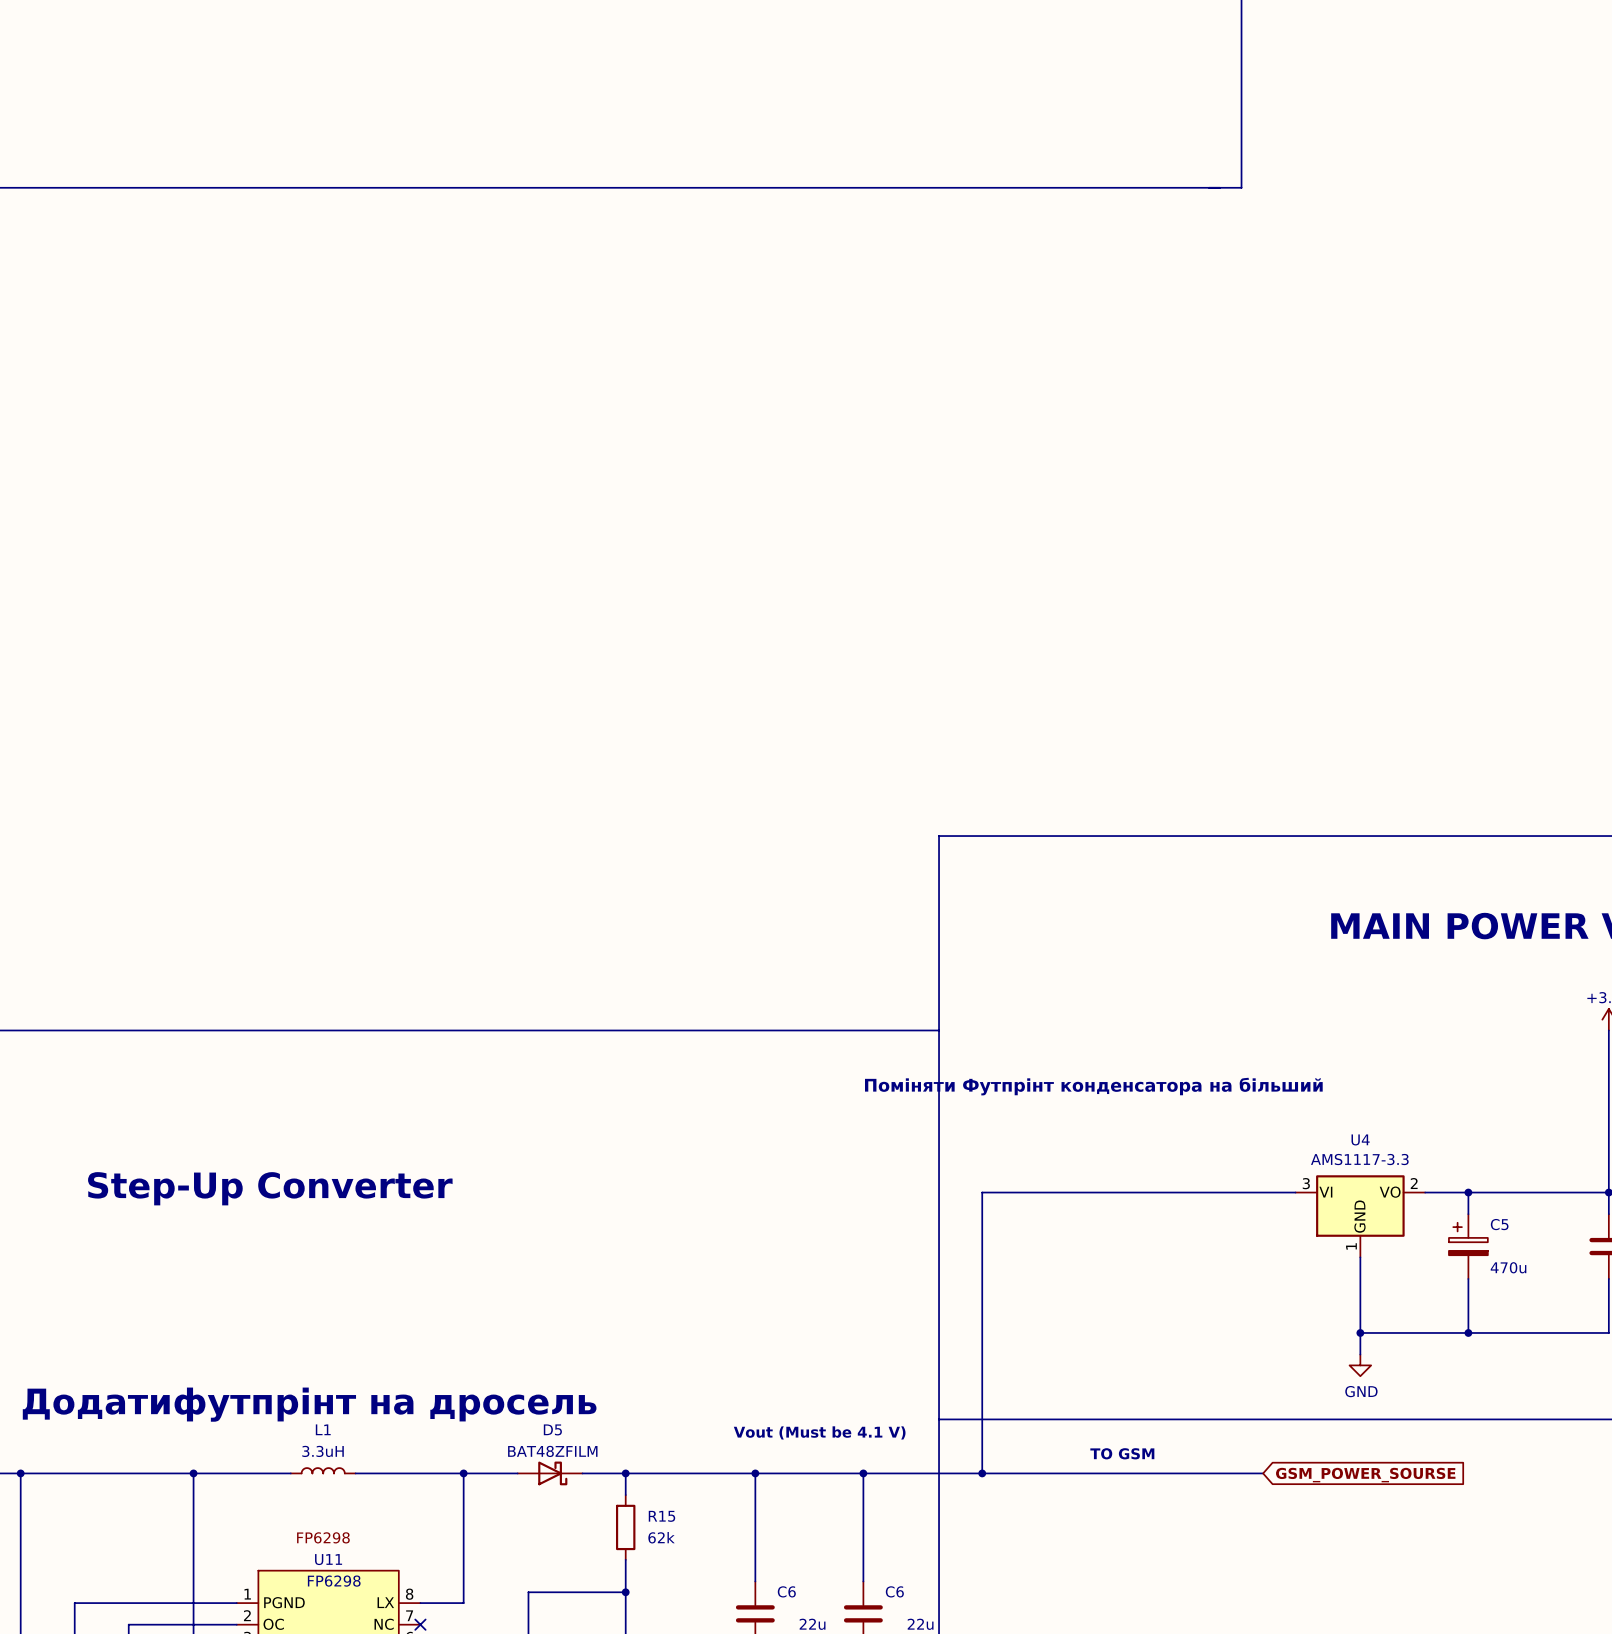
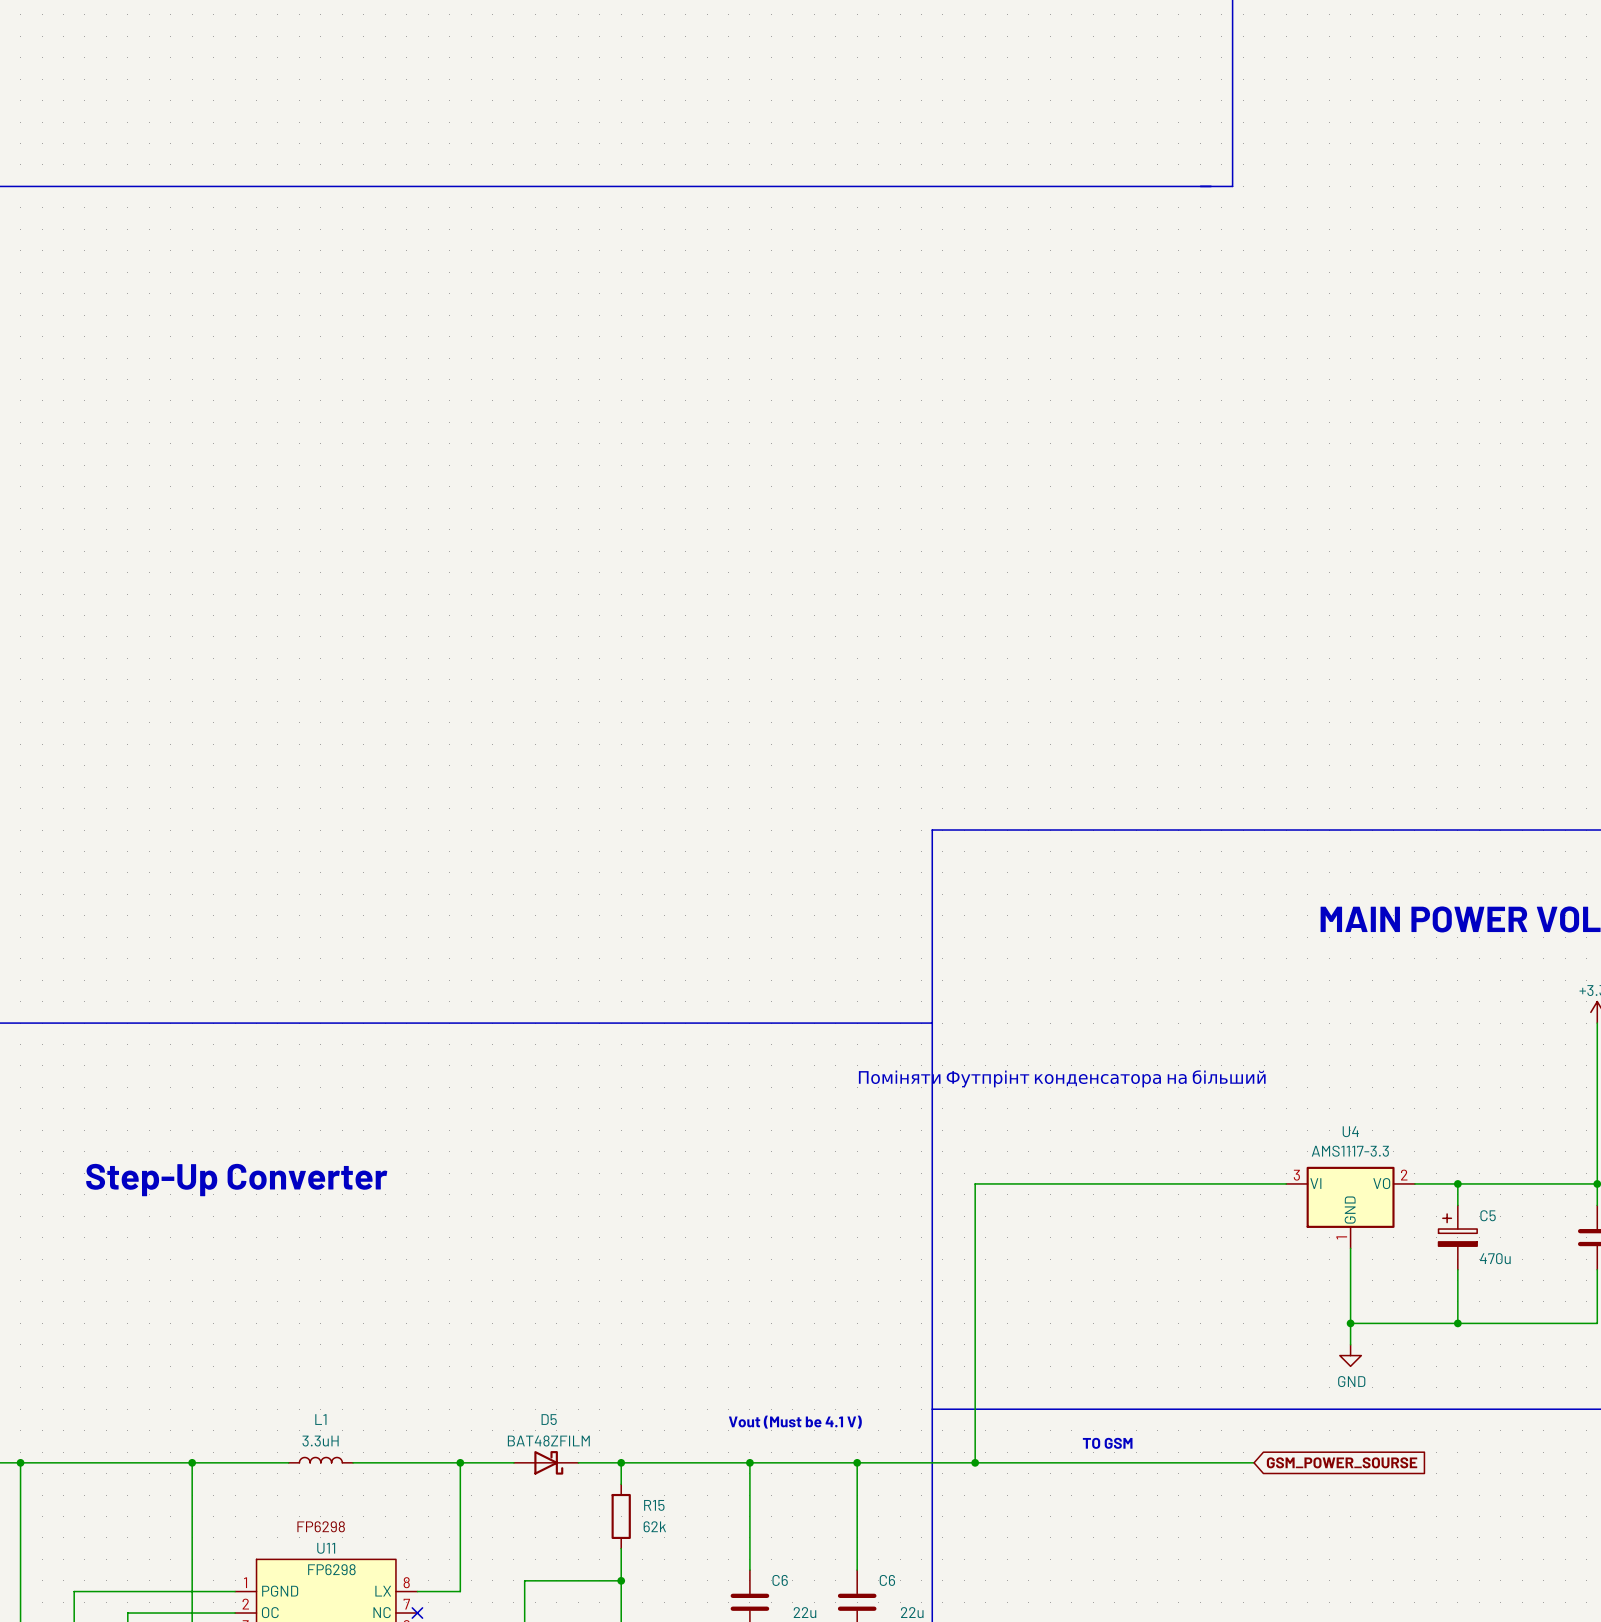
text: Додатифутпрінт на дросель (309, 1404) -> none

